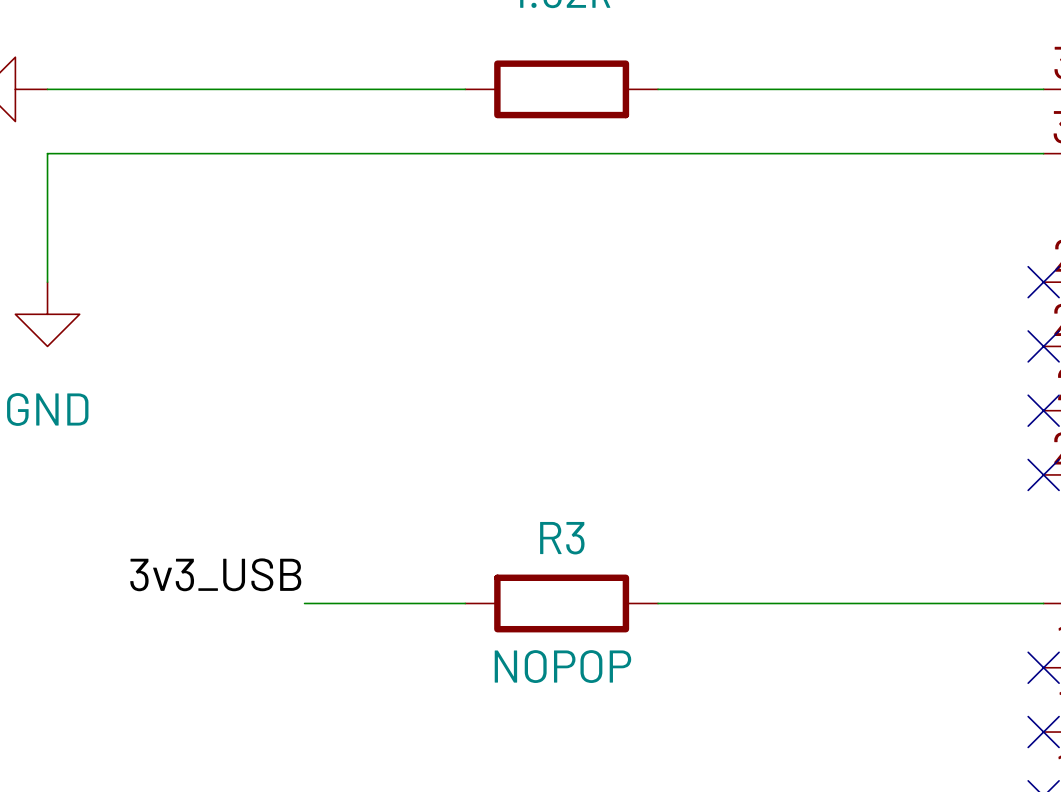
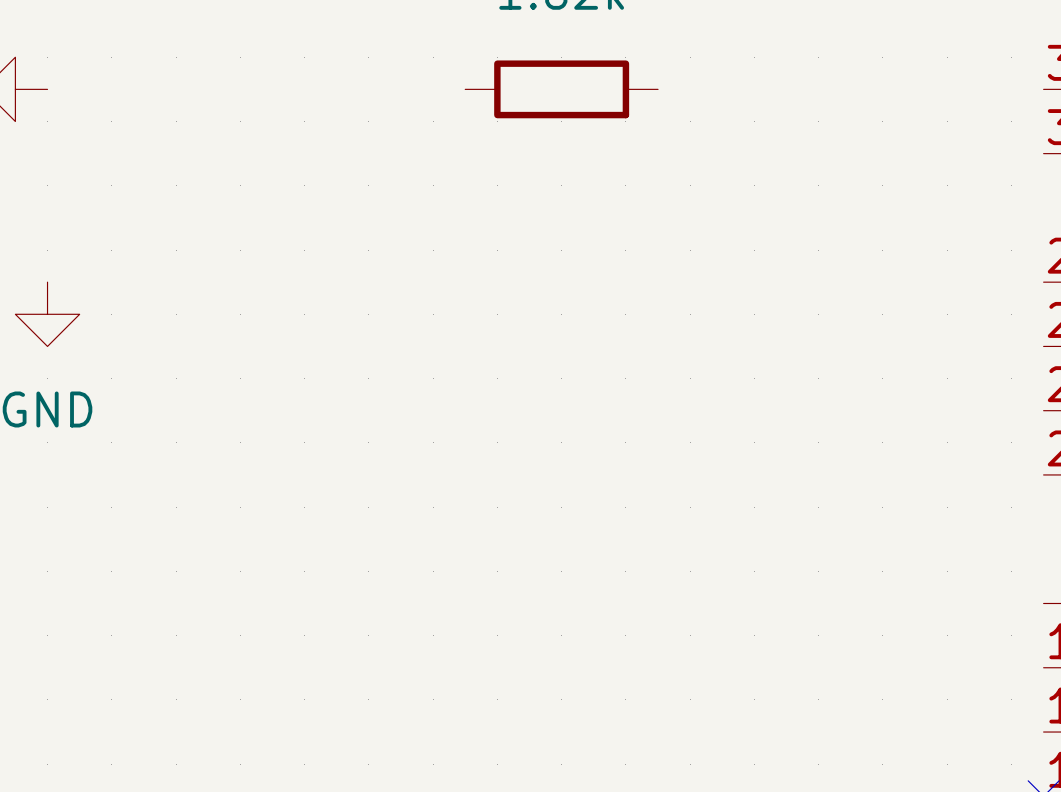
wire: (47, 89) (465, 89) -> none
wire: (658, 89) (1043, 89) -> none
wire: (1043, 153) (47, 153) (47, 282) -> none
no-connect mark: (1043, 282) -> none
no-connect mark: (1043, 346) -> none
no-connect mark: (1043, 410) -> none
no-connect mark: (1043, 474) -> none
label: 3v3_USB (215, 574) -> none
wire: (304, 603) (465, 603) -> none
R3: NOPOP (561, 603) -> none
wire: (658, 603) (1043, 603) -> none
no-connect mark: (1043, 667) -> none
no-connect mark: (1043, 732) -> none

